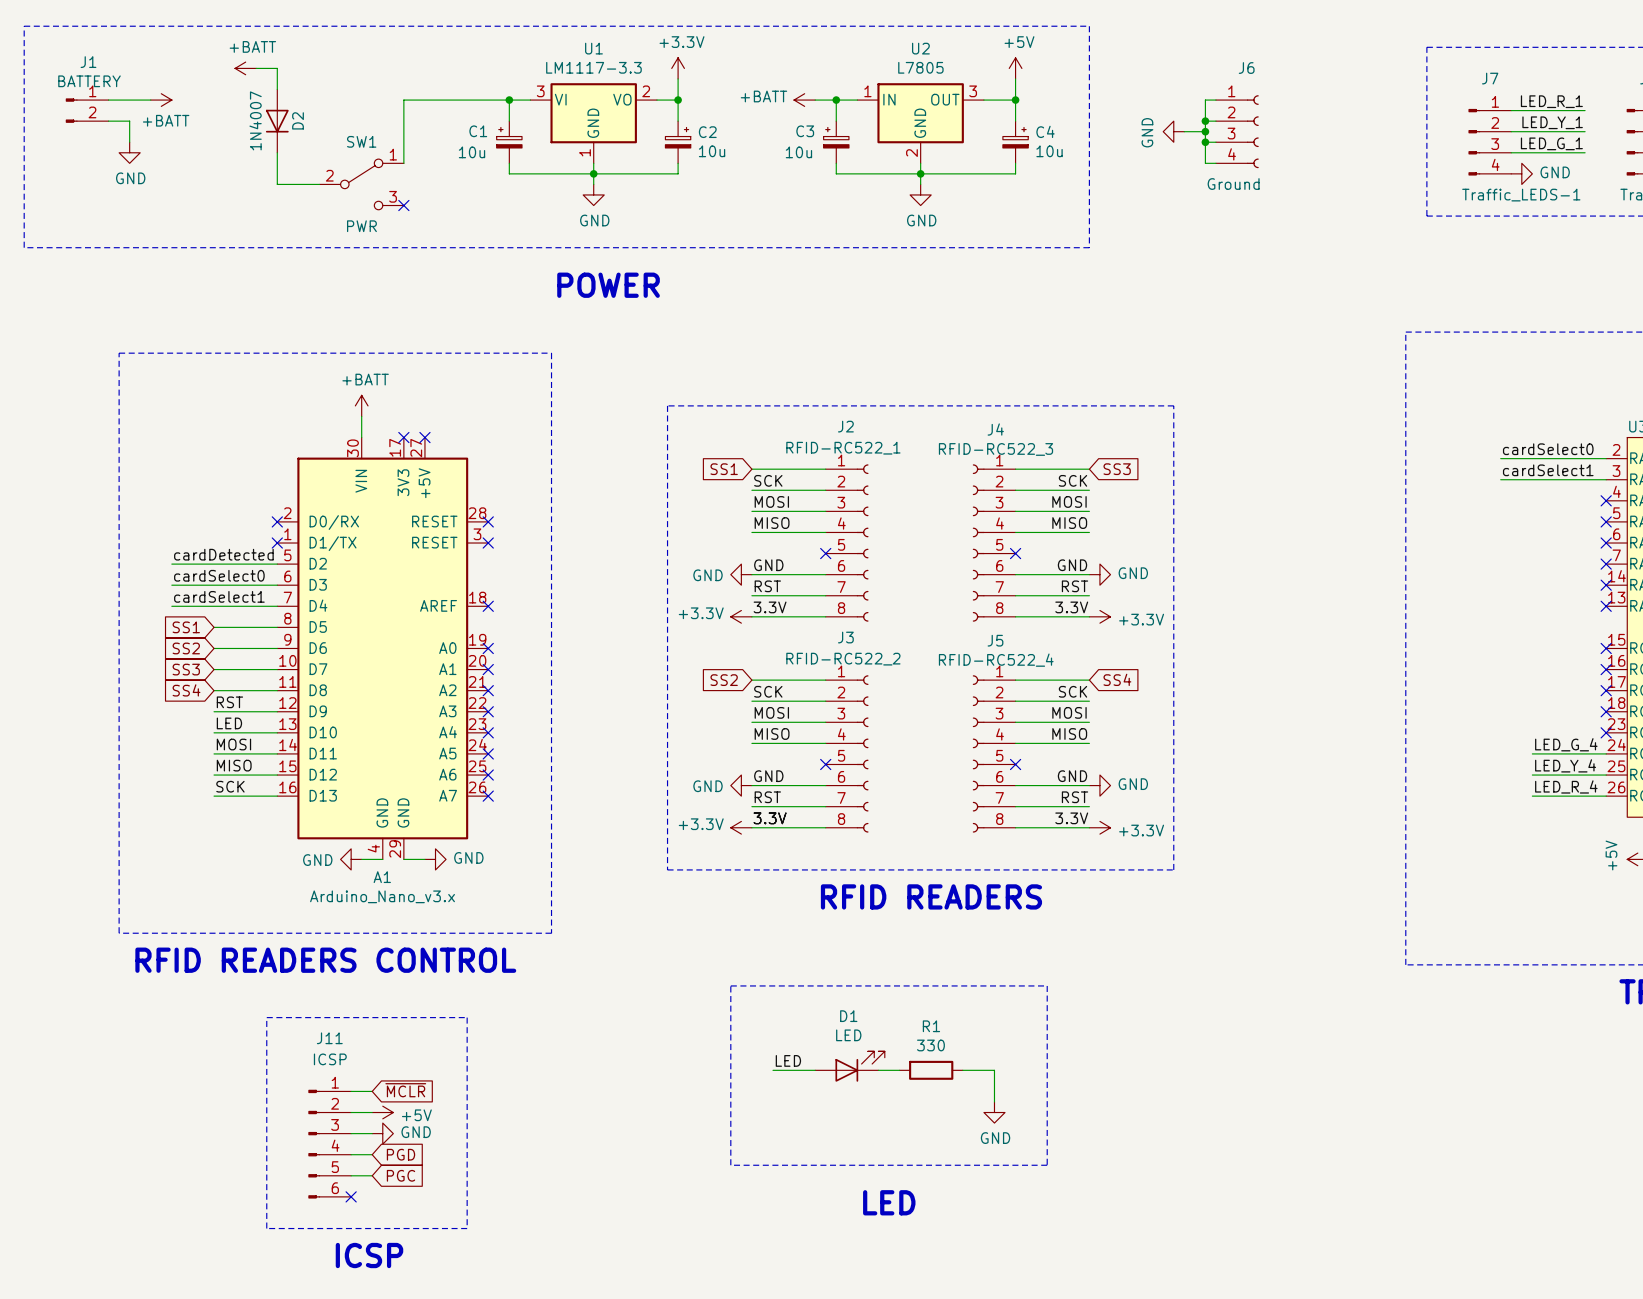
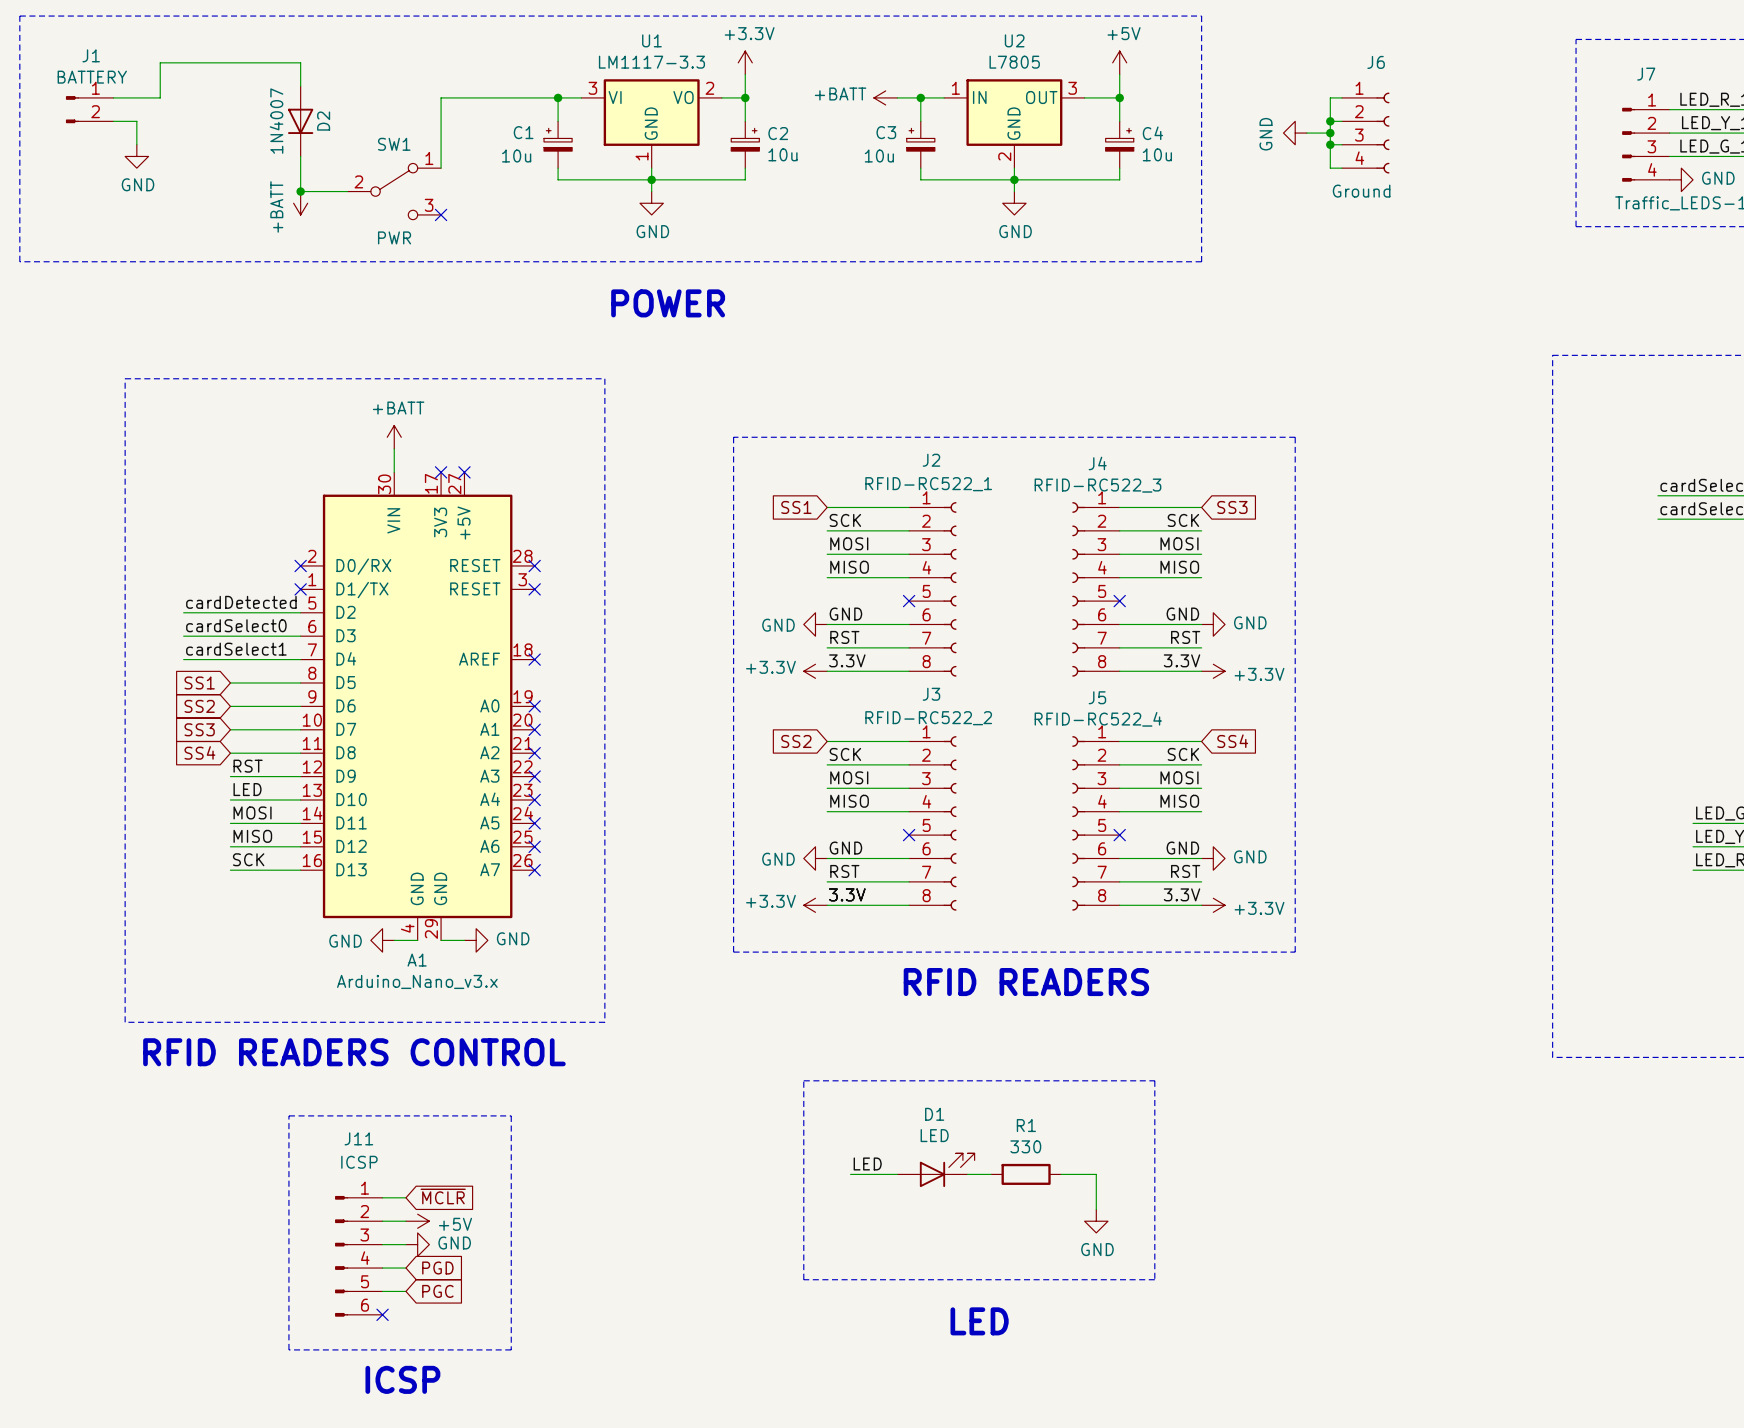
power symbol: +BATT (245, 68) -> none
wire: none -> (277, 62) (160, 62) (160, 97)
power symbol: +BATT (161, 100) -> none
junction: none -> (300, 191)
power symbol: none -> +BATT (300, 203)

